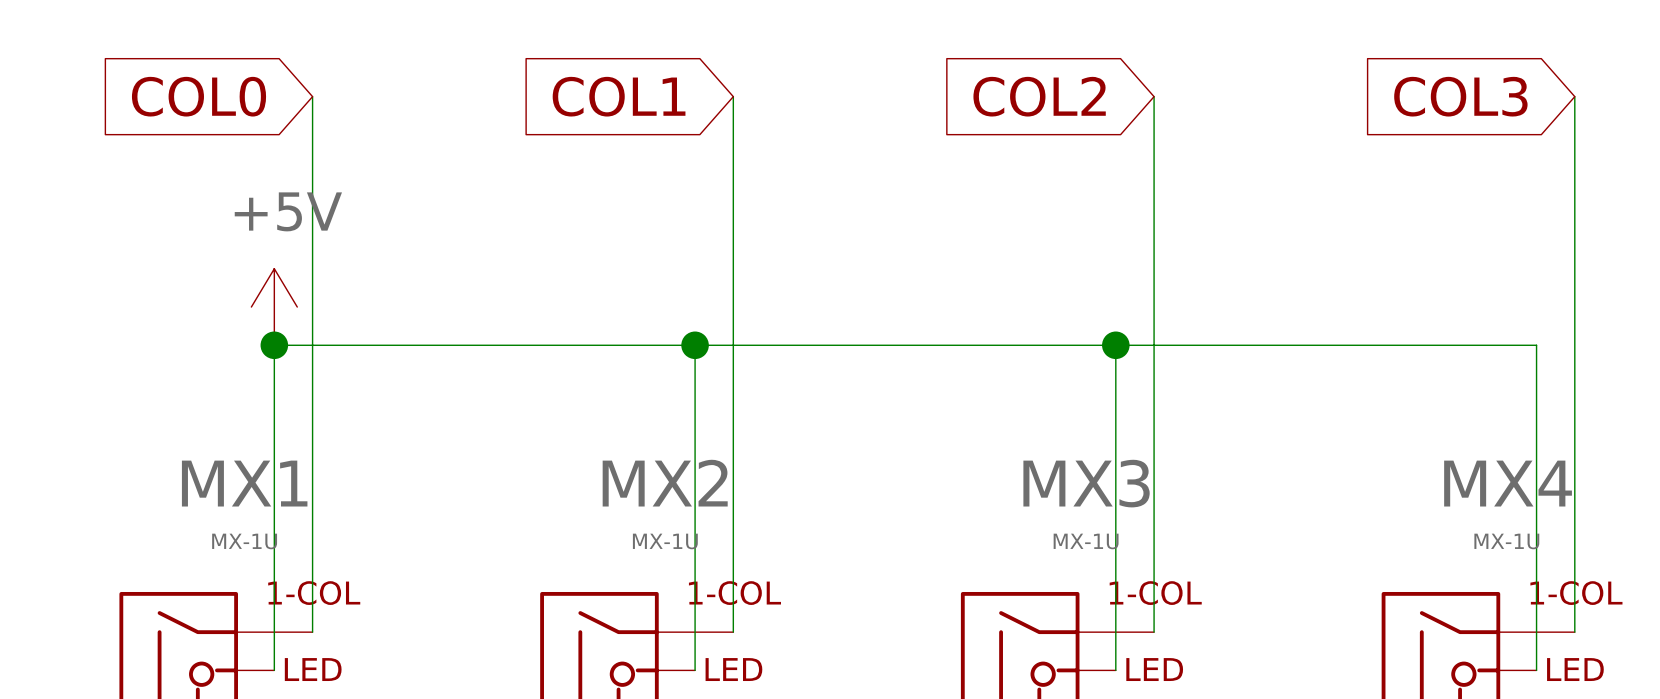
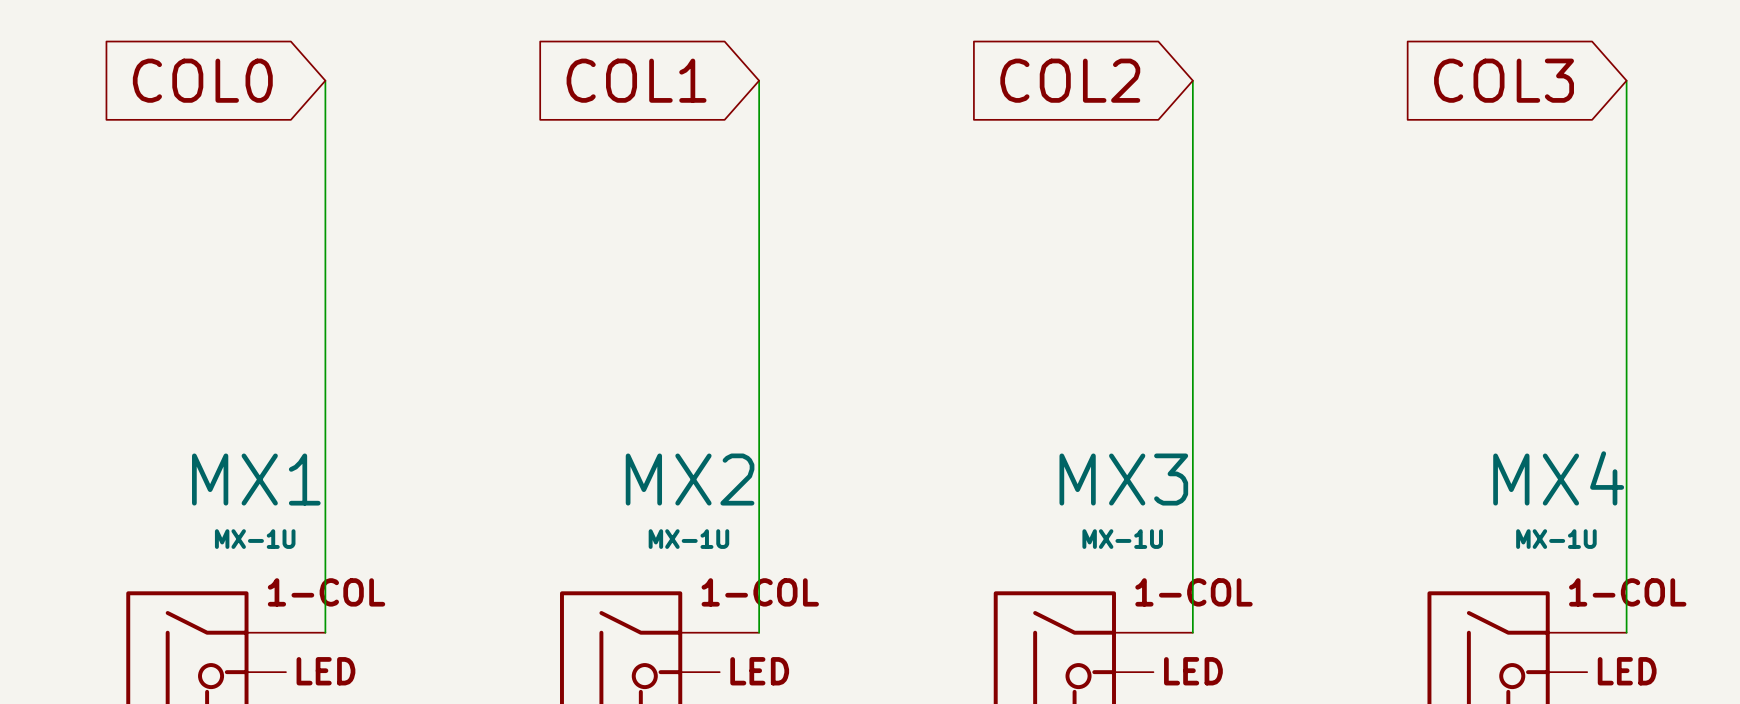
power symbol: +5V (274, 307) -> none
junction: (274, 345) -> none
wire: (695, 345) (695, 670) -> none
junction: (695, 345) -> none
wire: (1115, 345) (1115, 670) -> none
junction: (1115, 345) -> none
wire: (274, 670) (274, 345) (1536, 345) (1536, 670) -> none

